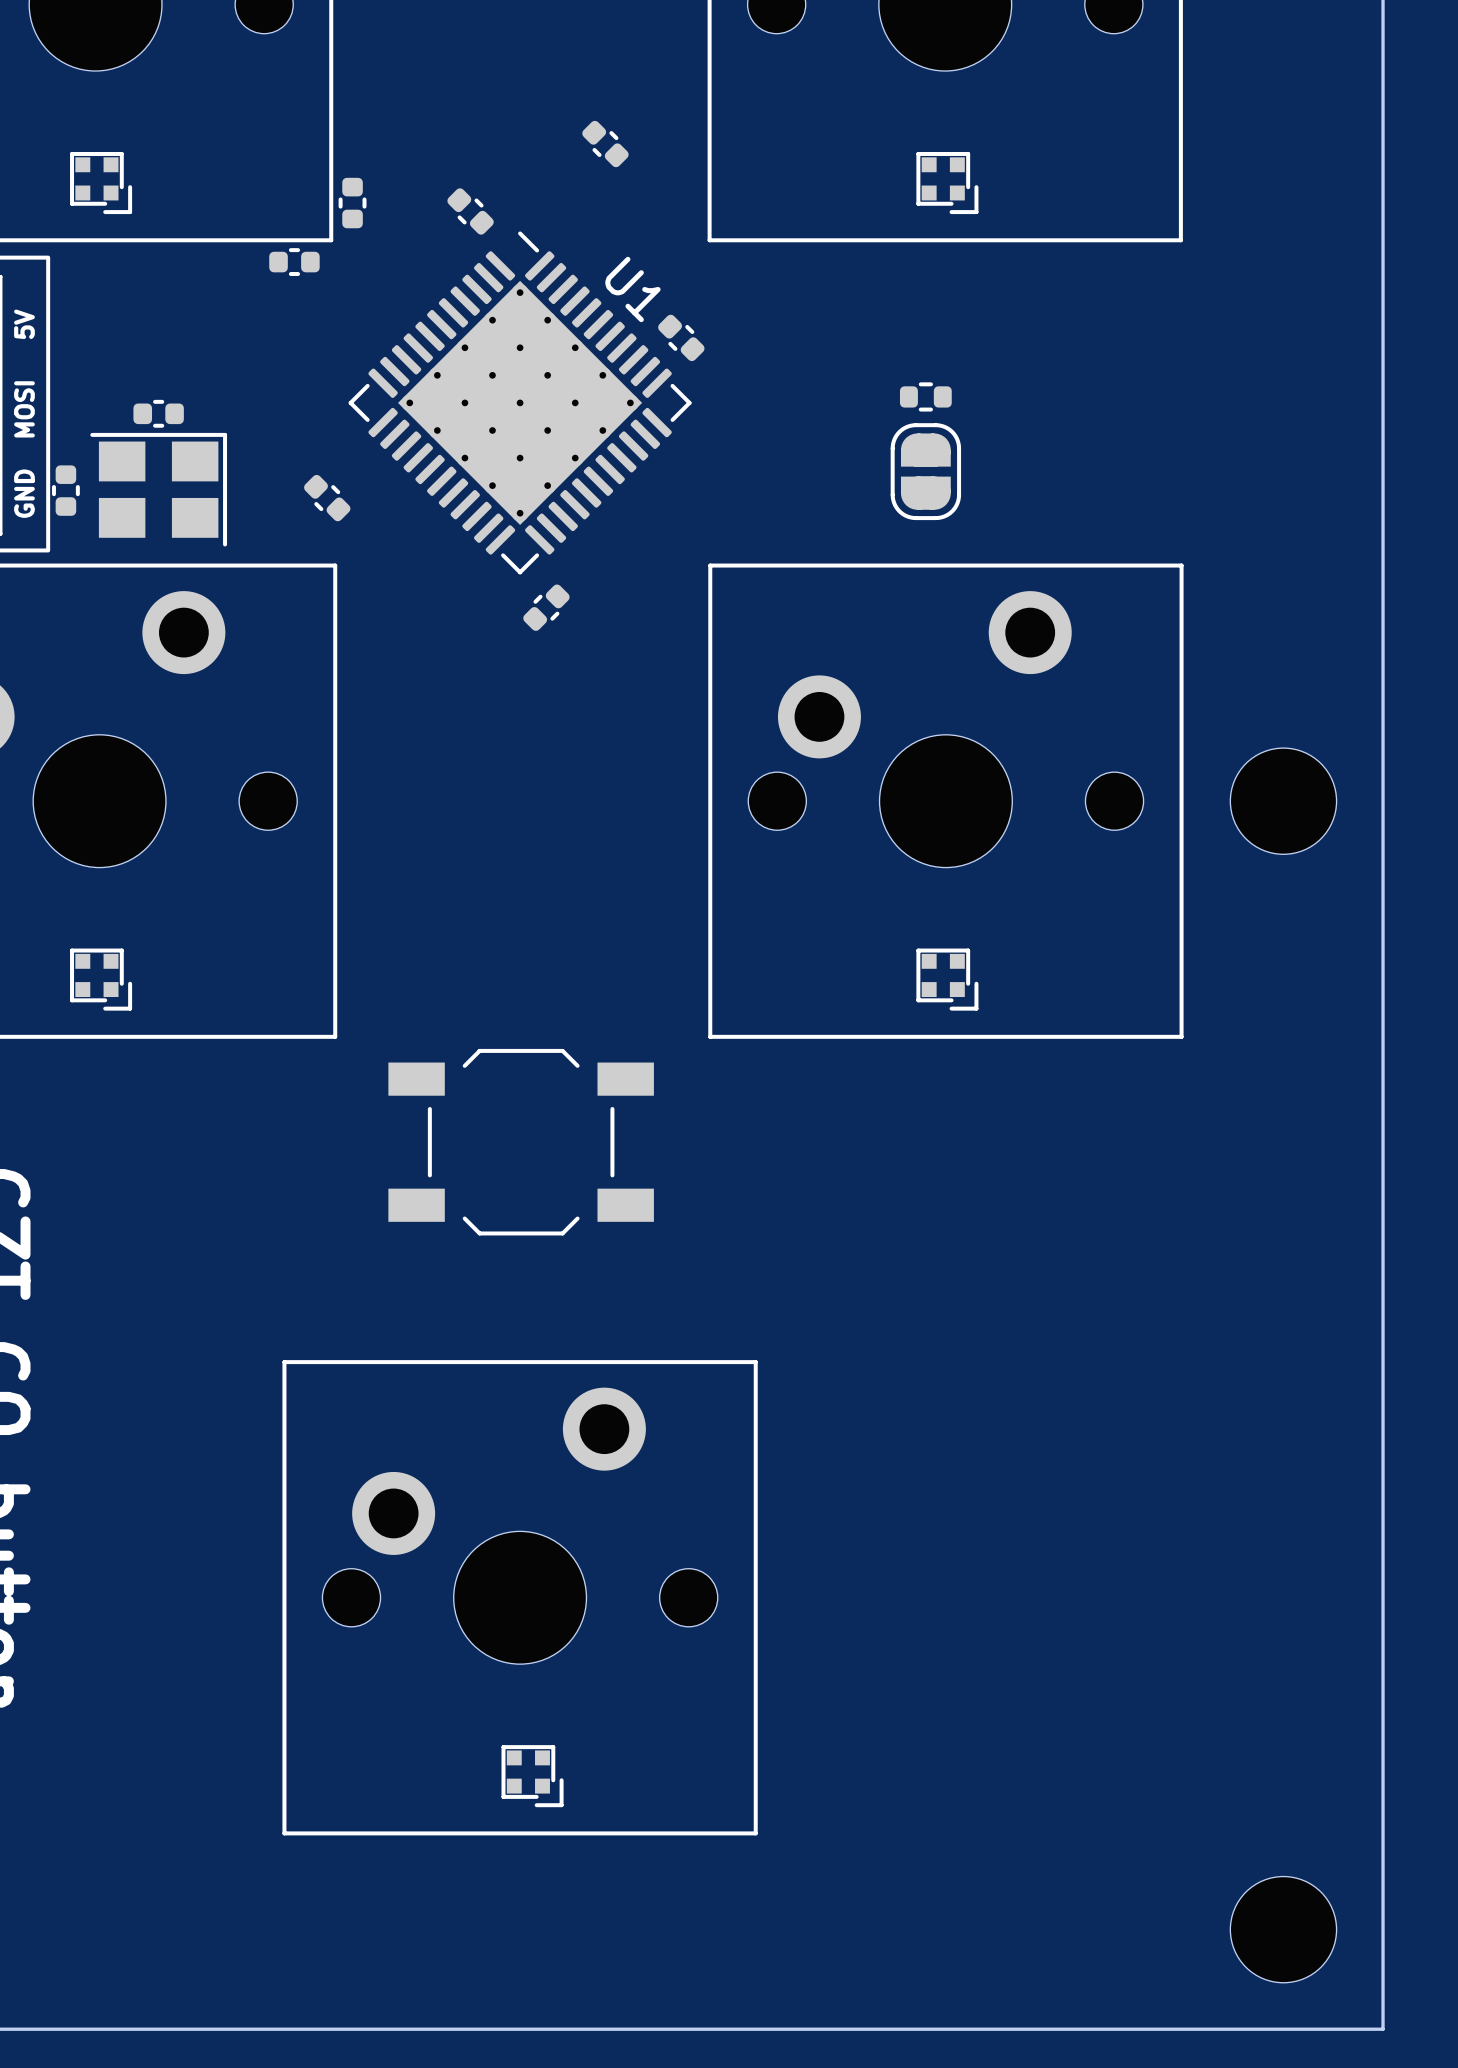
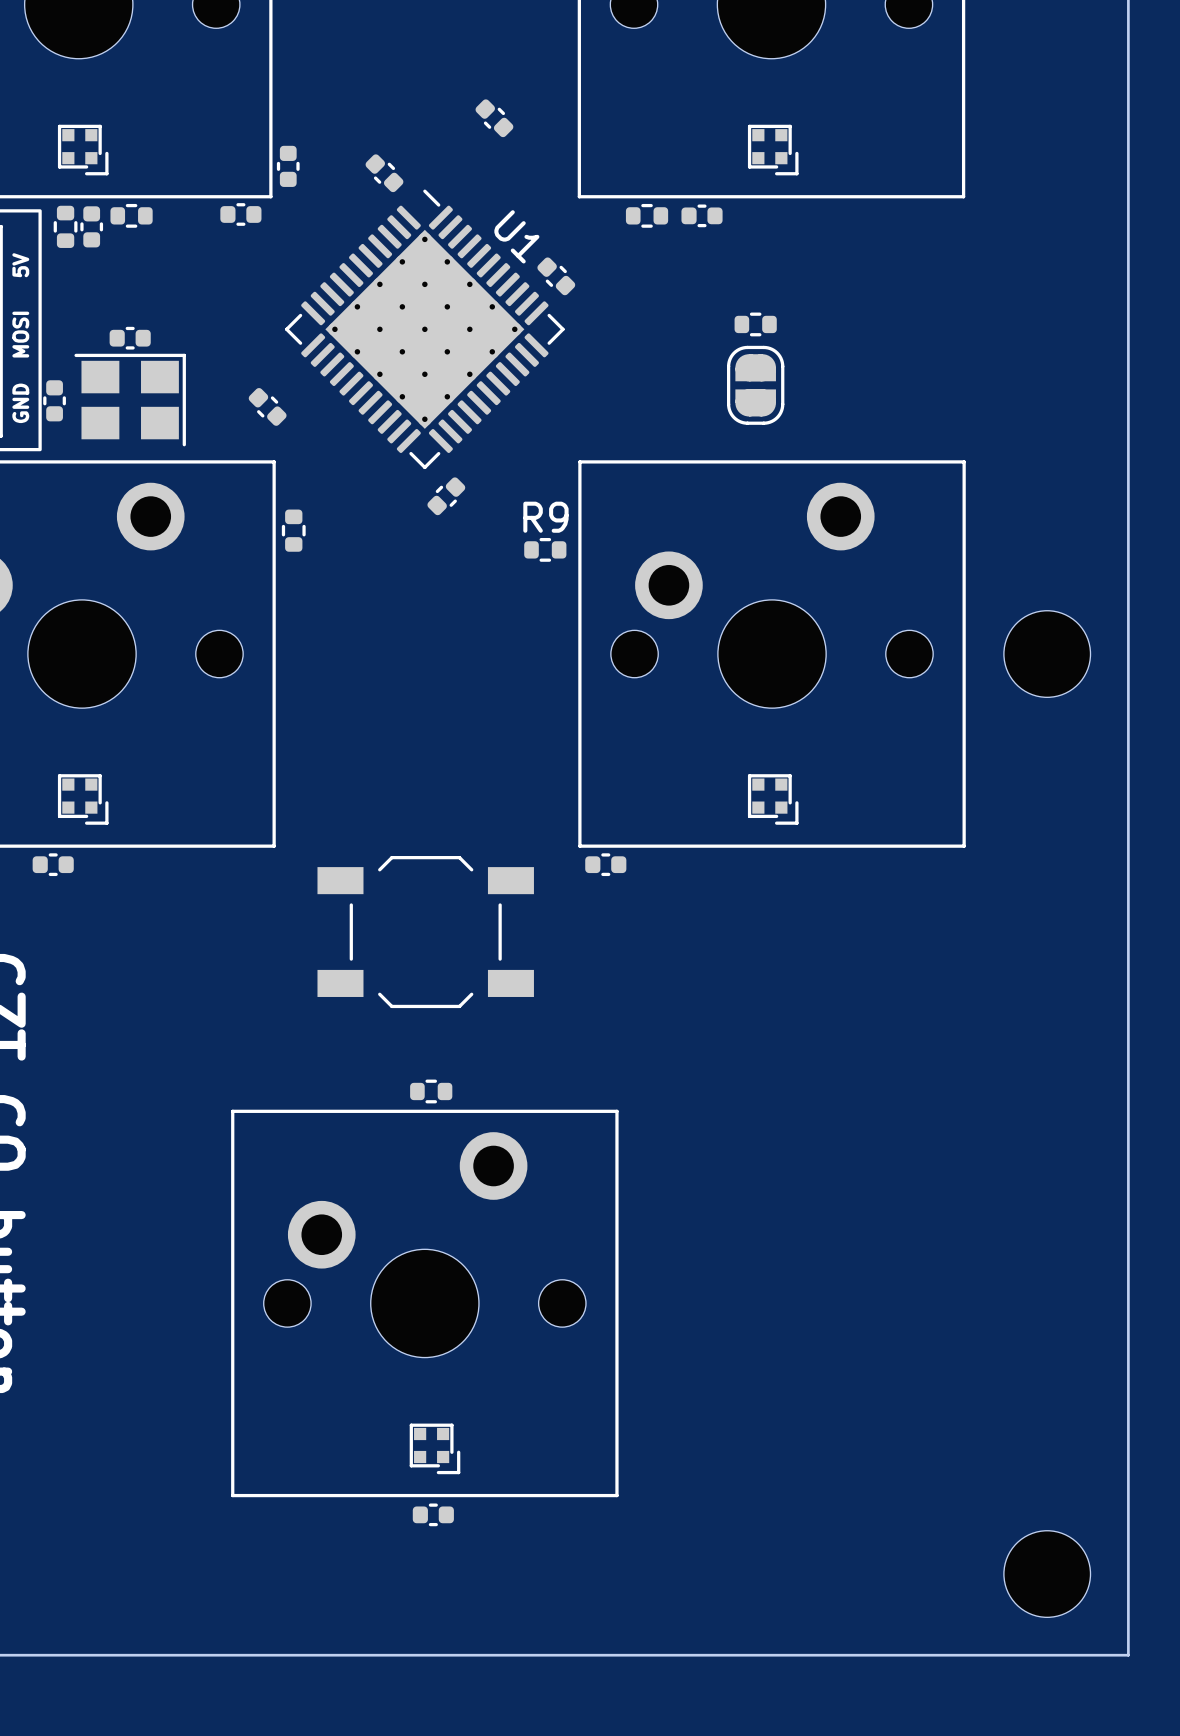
part: none -> (131, 215)
part: none -> (647, 215)
part: none -> (702, 215)
part: none -> (65, 226)
part: none -> (91, 226)
part: none -> (293, 530)
R9: none -> (545, 549)
part: none -> (53, 864)
part: none -> (605, 864)
part: none -> (431, 1091)
part: none -> (433, 1514)

